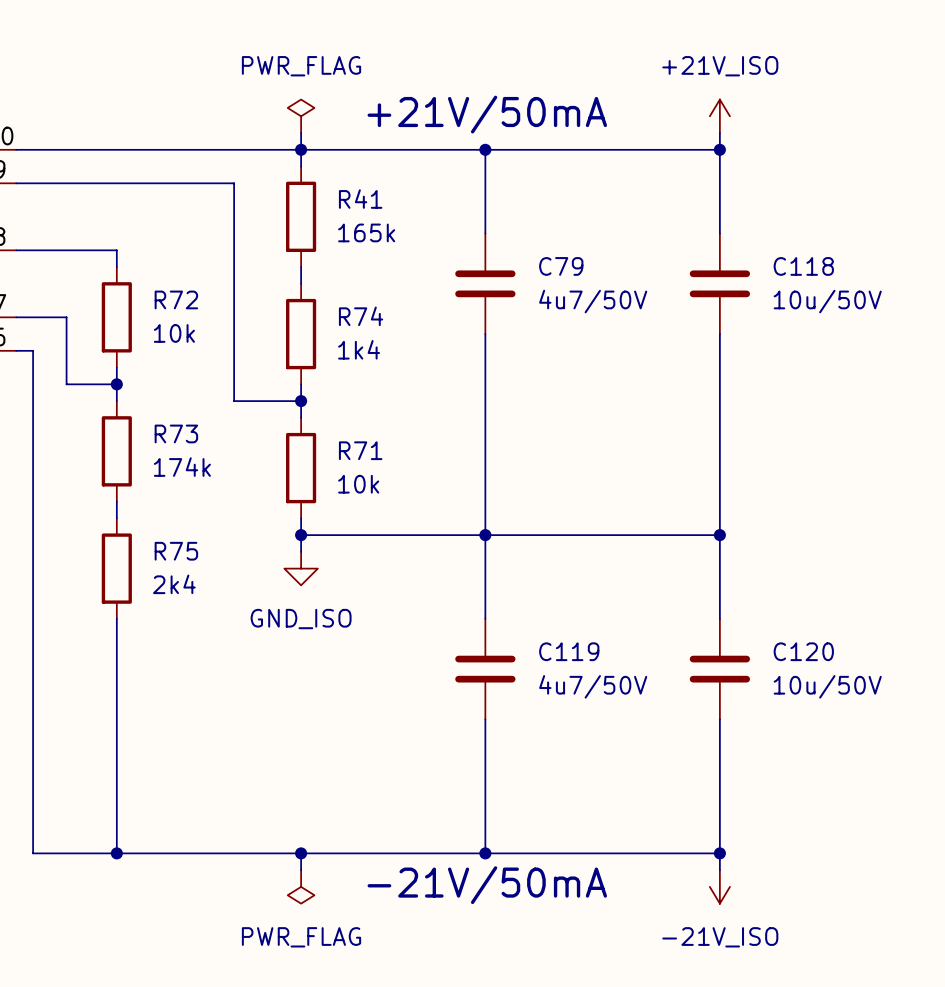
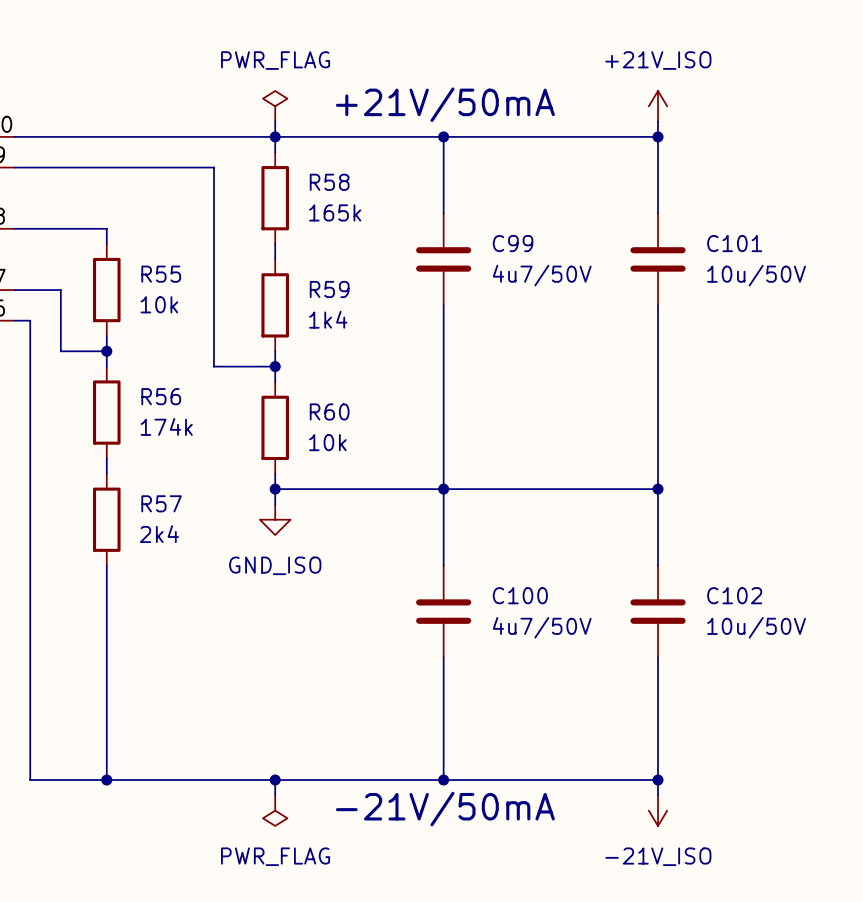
R41 name: R41 (360, 199) -> R58 (329, 182)
C79 name: C79 (561, 266) -> C99 (513, 243)
C118 name: C118 (803, 266) -> C101 (734, 243)
R72 name: R72 (176, 299) -> R55 (161, 274)
R74 name: R74 (361, 316) -> R59 (329, 289)
R73 name: R73 (176, 433) -> R56 (161, 396)
R71 name: R71 (360, 450) -> R60 (329, 411)
R75 name: R75 (176, 551) -> R57 (161, 503)
C119 name: C119 (569, 651) -> C100 (520, 595)
C120 name: C120 (803, 651) -> C102 (734, 595)

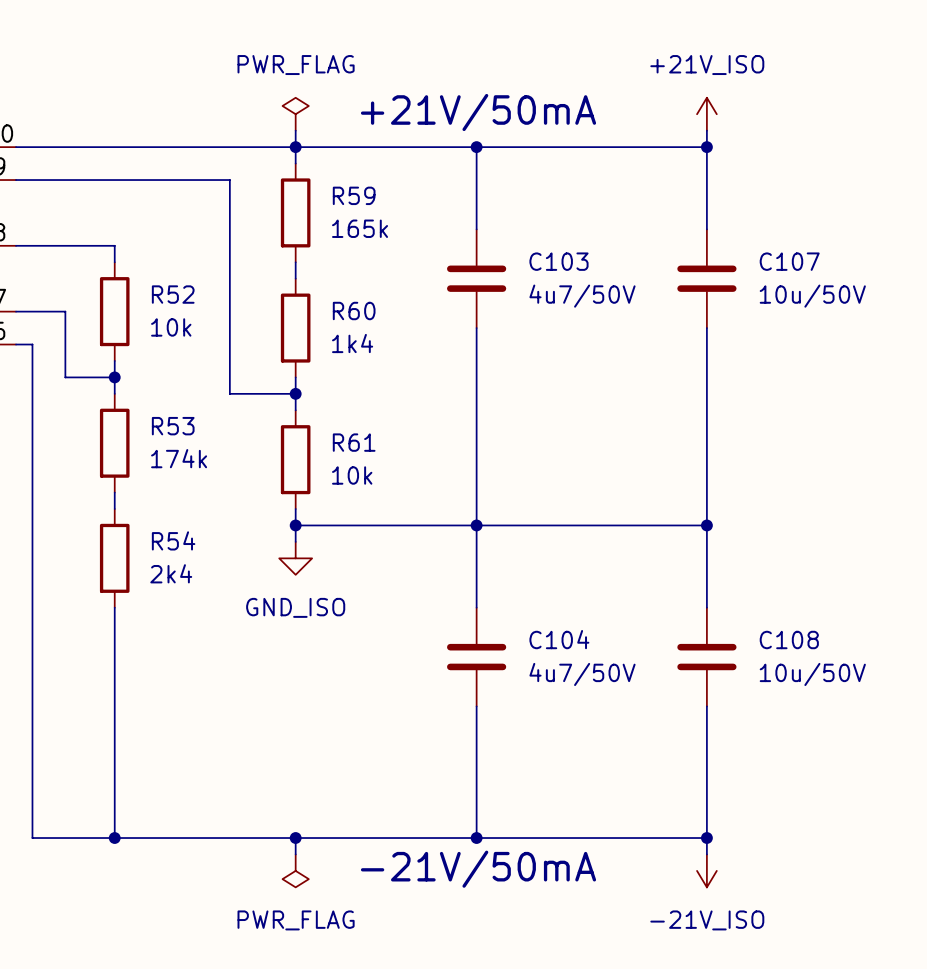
R58 name: R58 (329, 182) -> R59 (354, 195)
C99 name: C99 (513, 243) -> C103 (558, 261)
C101 name: C101 (734, 243) -> C107 (789, 261)
R55 name: R55 (161, 274) -> R52 (173, 294)
R59 name: R59 (329, 289) -> R60 (354, 311)
R56 name: R56 (161, 396) -> R53 (173, 426)
R60 name: R60 (329, 411) -> R61 (354, 442)
R57 name: R57 (161, 503) -> R54 (173, 540)
C100 name: C100 (520, 595) -> C104 (559, 639)
C102 name: C102 (734, 595) -> C108 (789, 639)

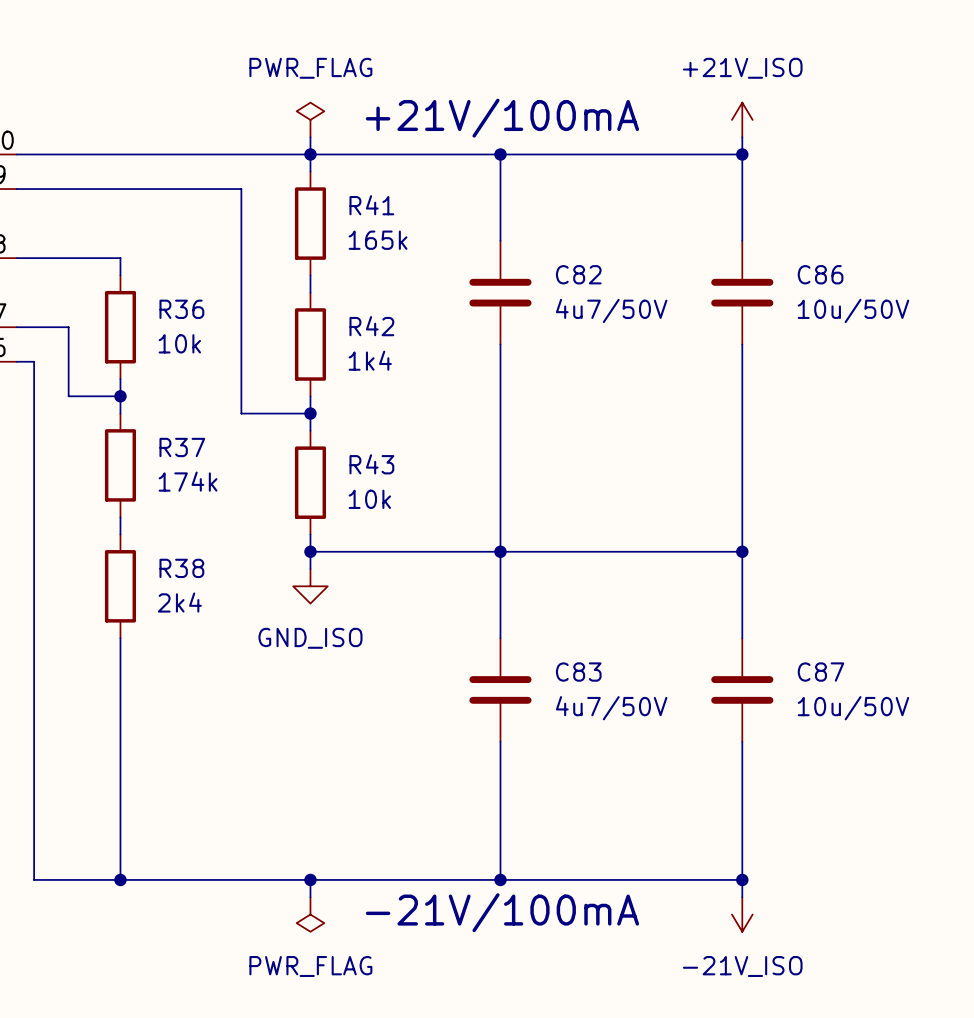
text: +21V/50mA (478, 112) -> +21V/100mA (502, 118)
R59 name: R59 (354, 195) -> R41 (371, 205)
C103 name: C103 (558, 261) -> C82 (578, 274)
C107 name: C107 (789, 261) -> C86 (820, 274)
R52 name: R52 (173, 294) -> R36 (181, 309)
R60 name: R60 (354, 311) -> R42 (371, 326)
R53 name: R53 (173, 426) -> R37 (182, 447)
R61 name: R61 (354, 442) -> R43 (371, 464)
R54 name: R54 (173, 540) -> R38 (181, 568)
C104 name: C104 (559, 639) -> C83 (578, 672)
C108 name: C108 (789, 639) -> C87 (820, 672)
text: -21V/50mA (478, 869) -> -21V/100mA (502, 912)

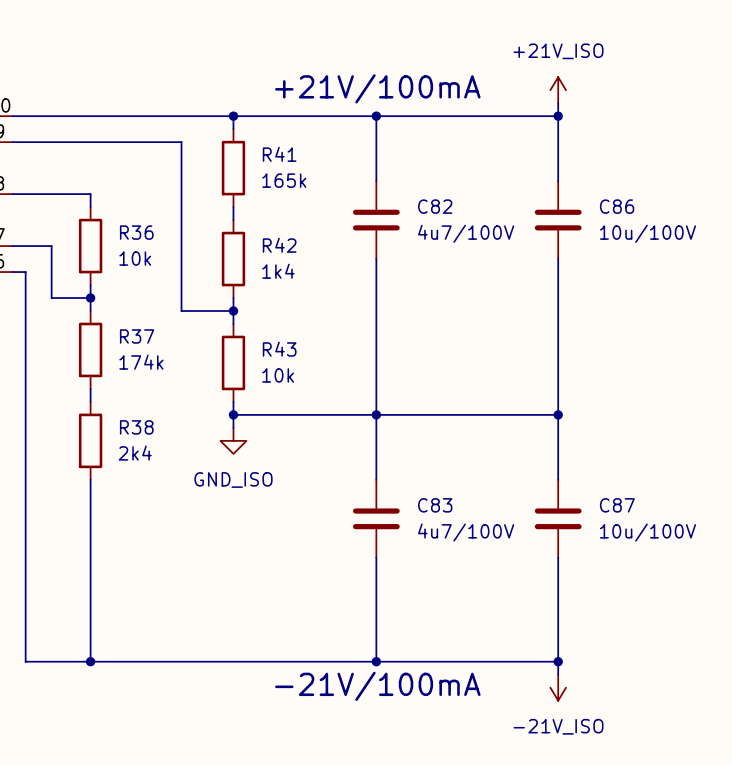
power symbol: PWR_FLAG (310, 119) -> none
wire: (310, 137) (310, 154) -> none
C82 value: 4u7/50V (611, 310) -> 4u7/100V (466, 233)
C86 value: 10u/50V (853, 310) -> 10u/100V (647, 233)
C83 value: 4u7/50V (611, 708) -> 4u7/100V (466, 532)
C87 value: 10u/50V (853, 708) -> 10u/100V (647, 532)
wire: (310, 879) (310, 897) -> none
junction: (310, 879) -> none
power symbol: PWR_FLAG (310, 914) -> none

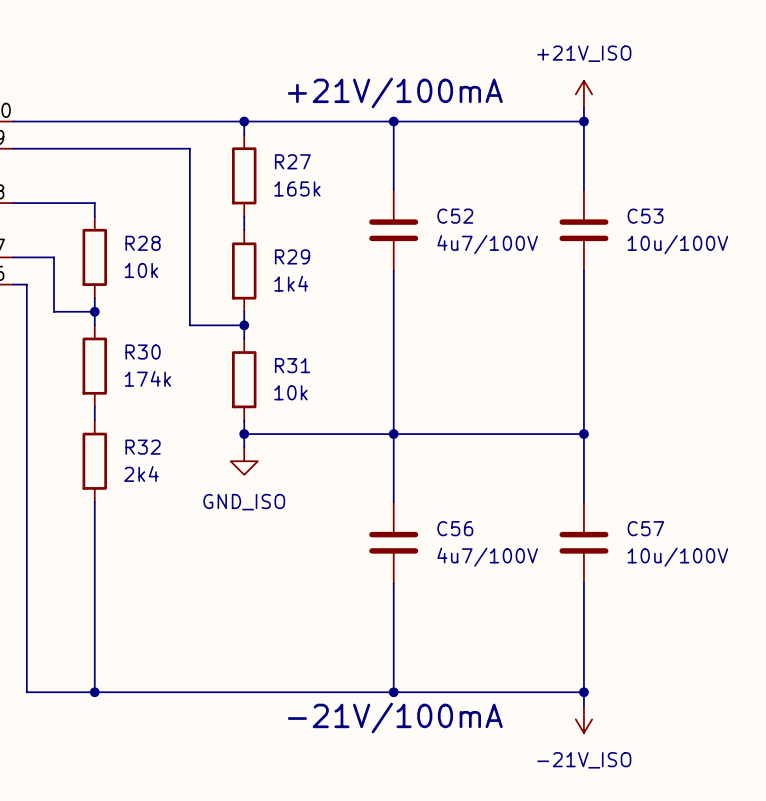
R41 name: R41 (279, 154) -> R27 (292, 161)
C82 name: C82 (435, 206) -> C52 (455, 216)
C86 name: C86 (617, 206) -> C53 (645, 216)
R36 name: R36 (136, 232) -> R28 (143, 243)
R42 name: R42 (279, 245) -> R29 (292, 256)
R37 name: R37 (137, 336) -> R30 (143, 352)
R43 name: R43 (279, 349) -> R31 (292, 365)
R38 name: R38 (136, 427) -> R32 (143, 447)
C83 name: C83 (435, 505) -> C56 (455, 528)
C87 name: C87 (617, 505) -> C57 (645, 528)

